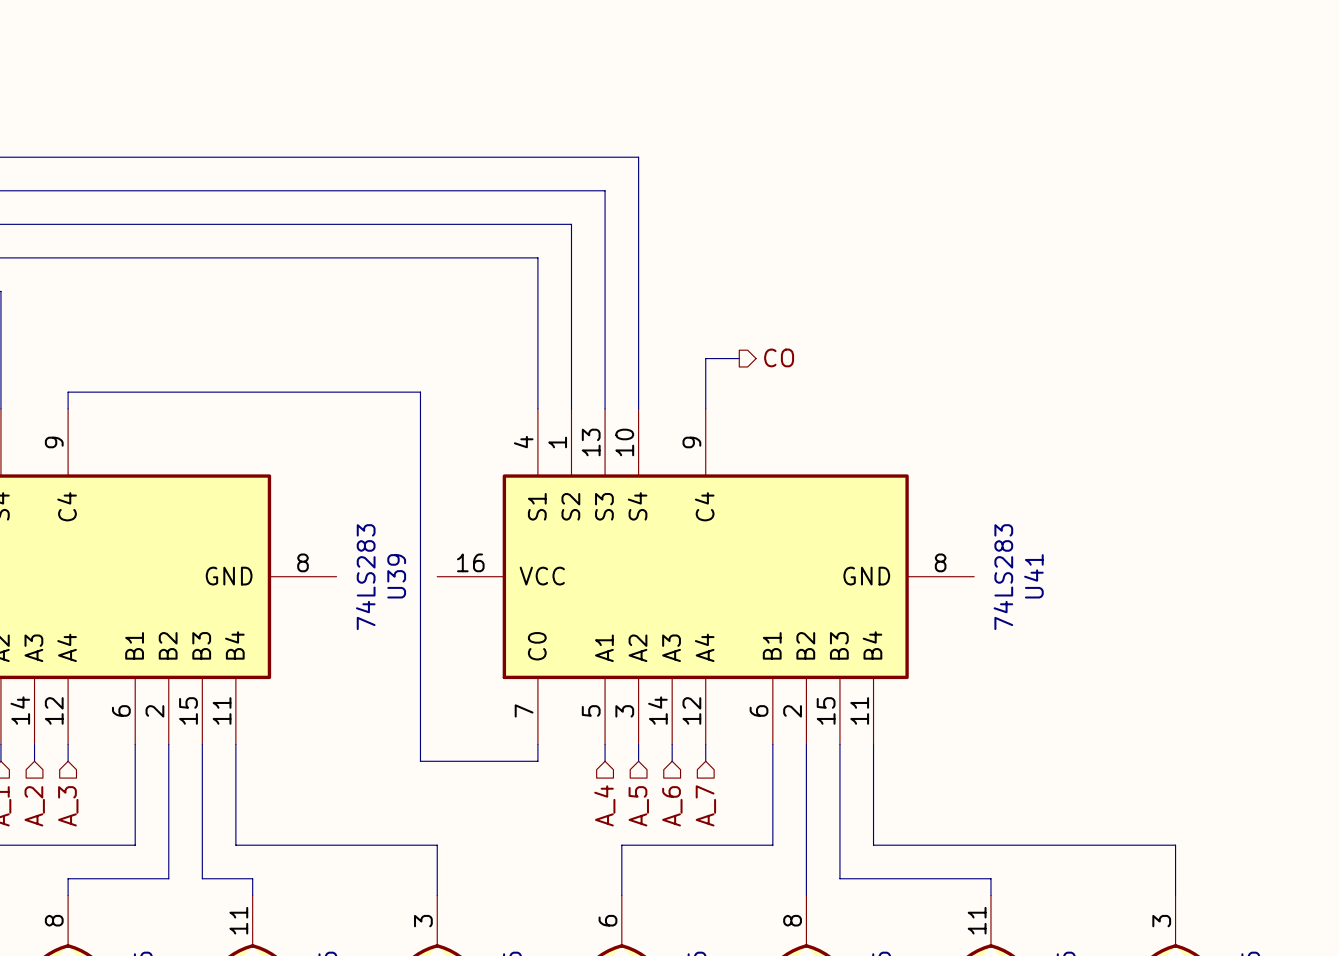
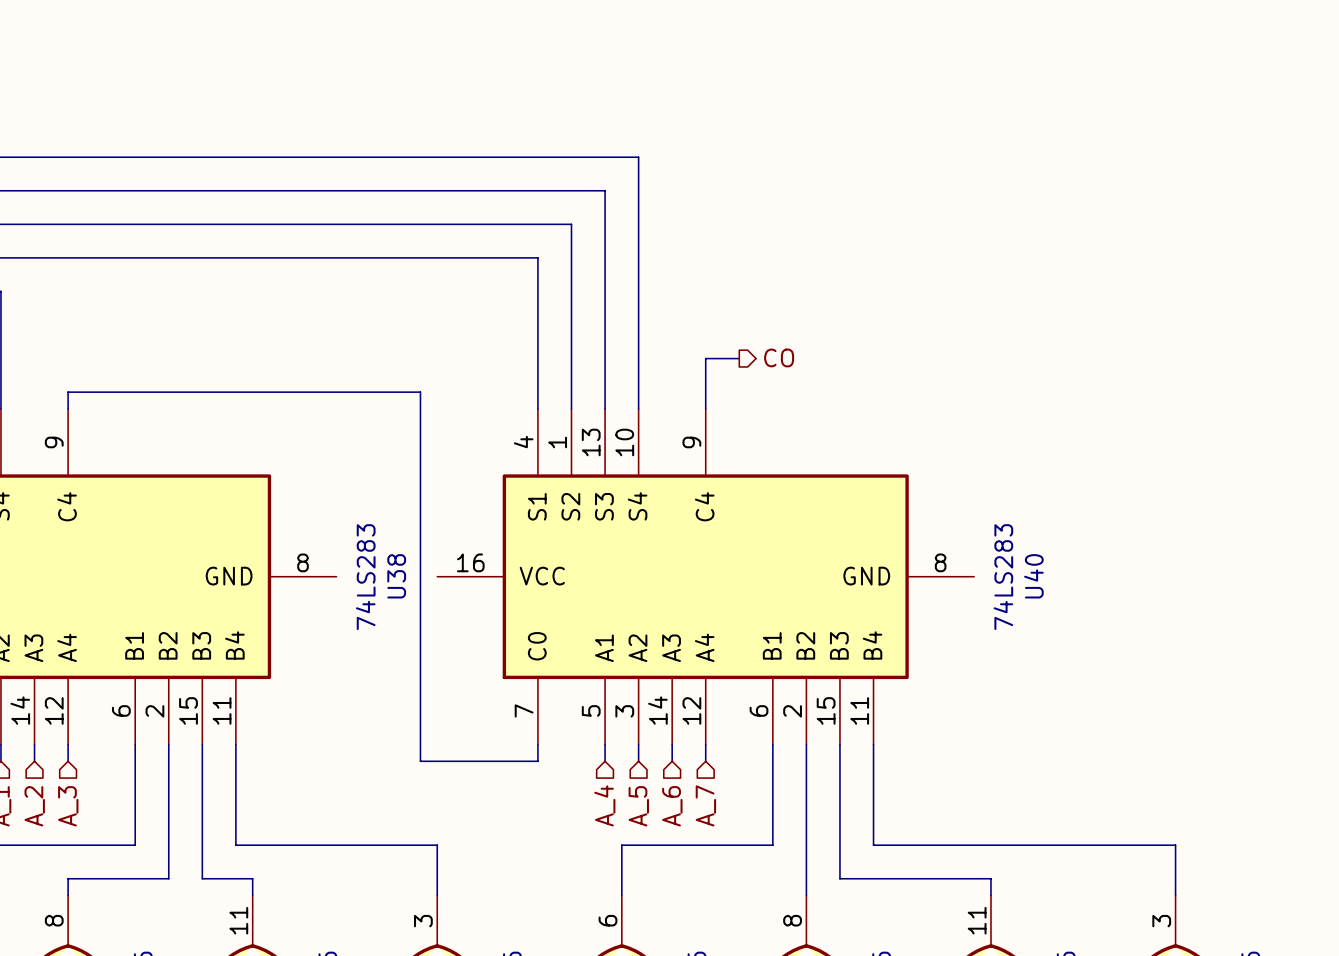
U39 name: U39 (396, 576) -> U38 (396, 576)
U41 name: U41 (1033, 576) -> U40 (1033, 576)

